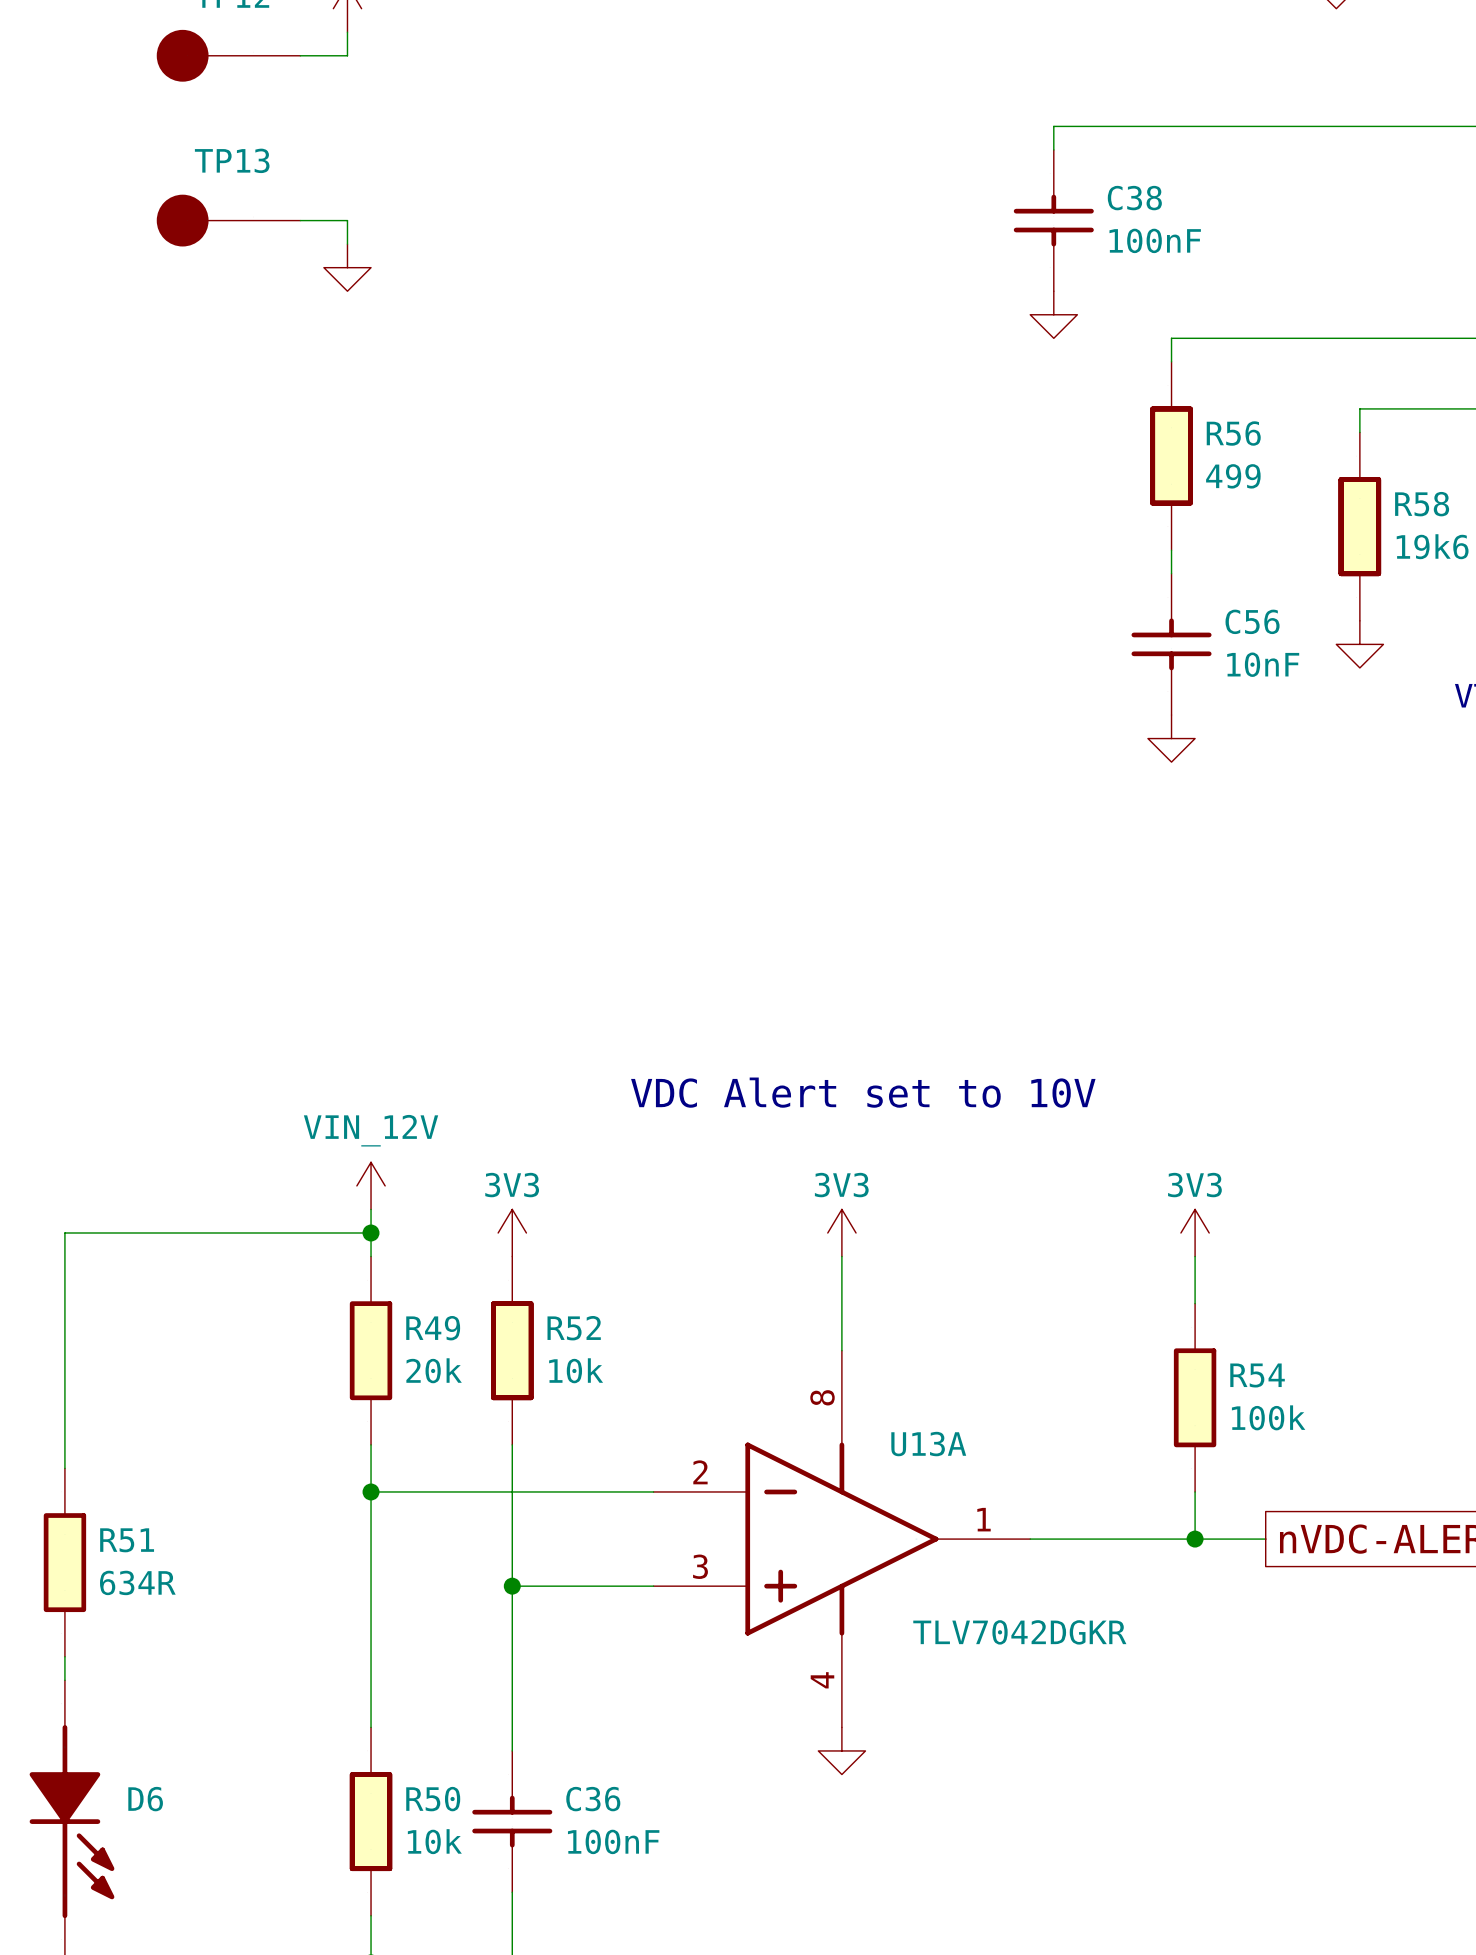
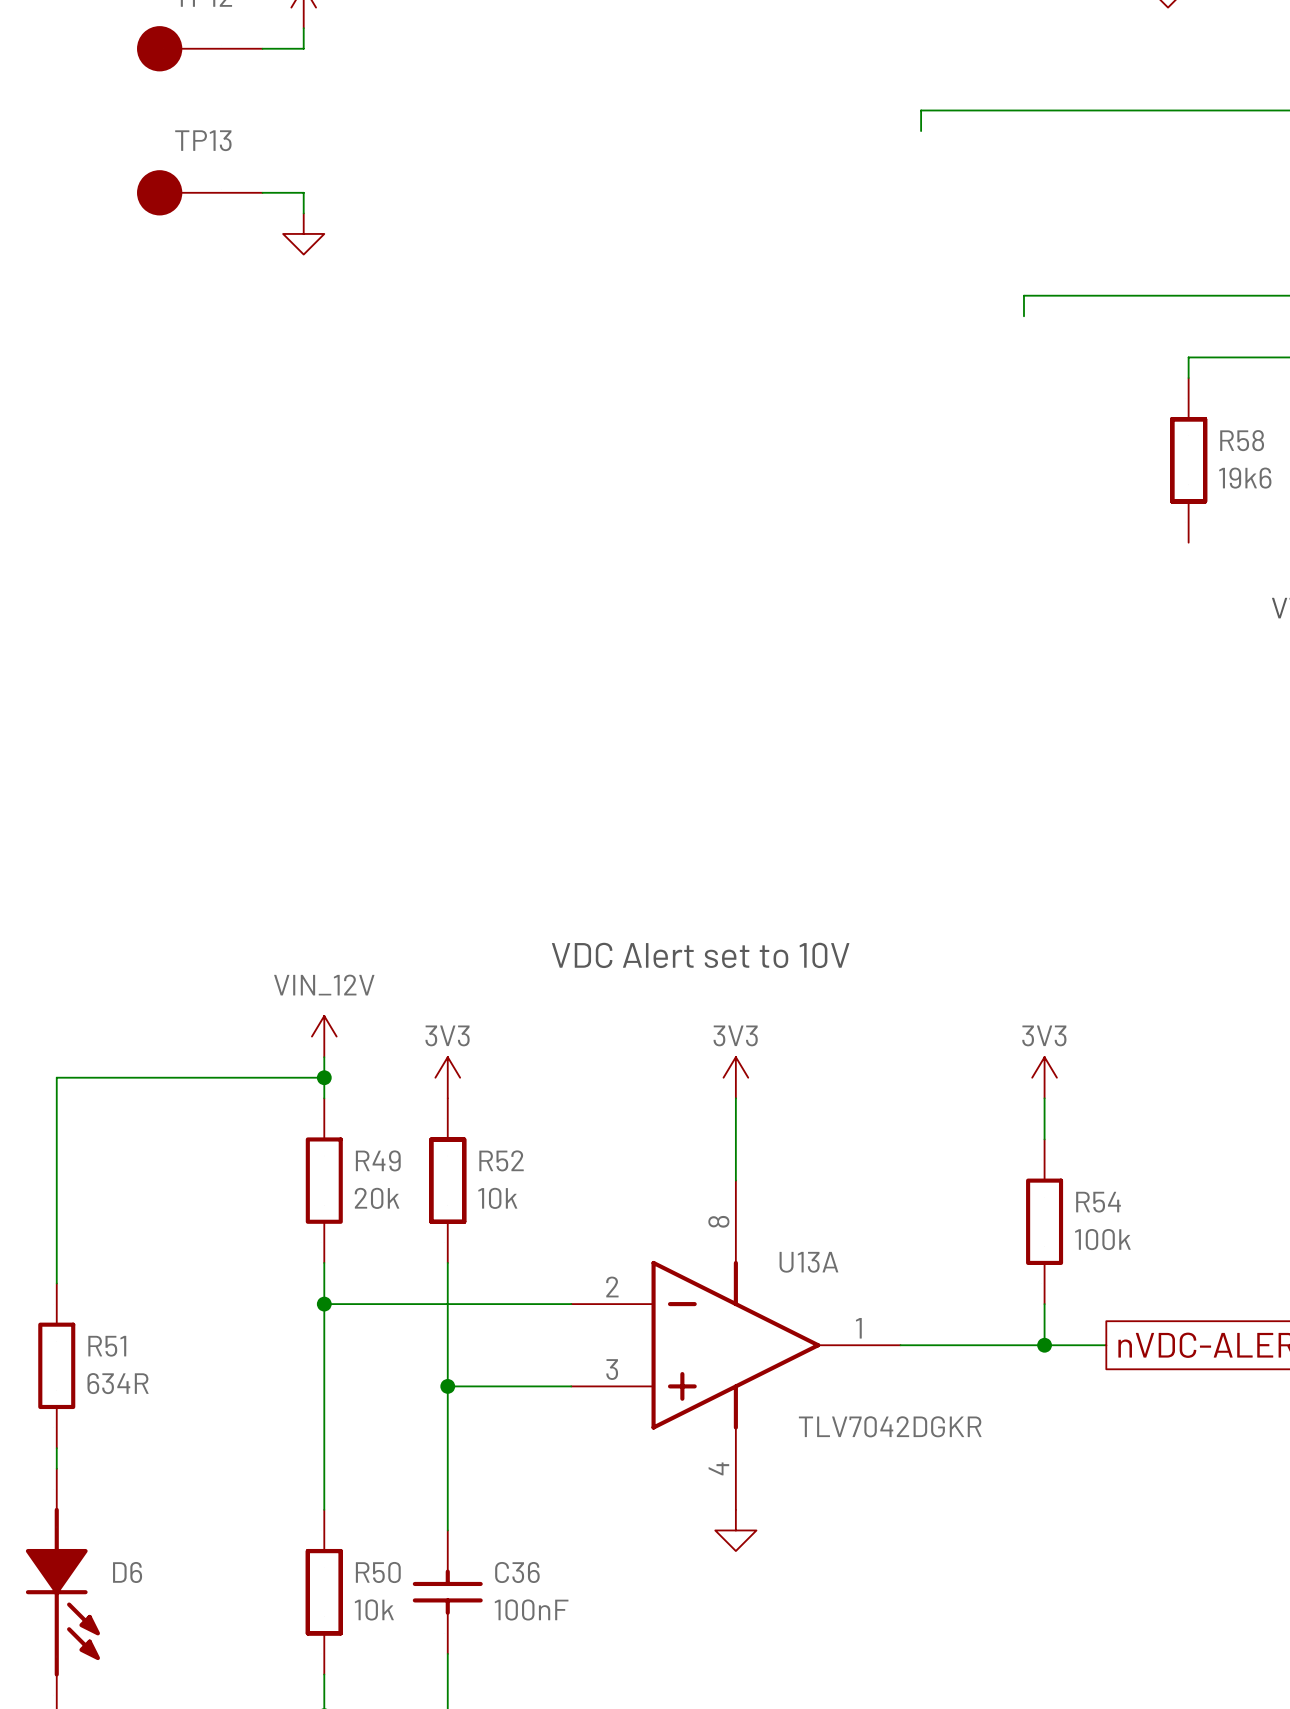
C38: (1053, 220) -> none
power symbol: (1053, 314) -> none
R56: (1171, 456) -> none
wire: (1171, 550) (1171, 573) -> none
C56: (1171, 644) -> none
power symbol: (1359, 644) -> none
power symbol: (1171, 738) -> none

